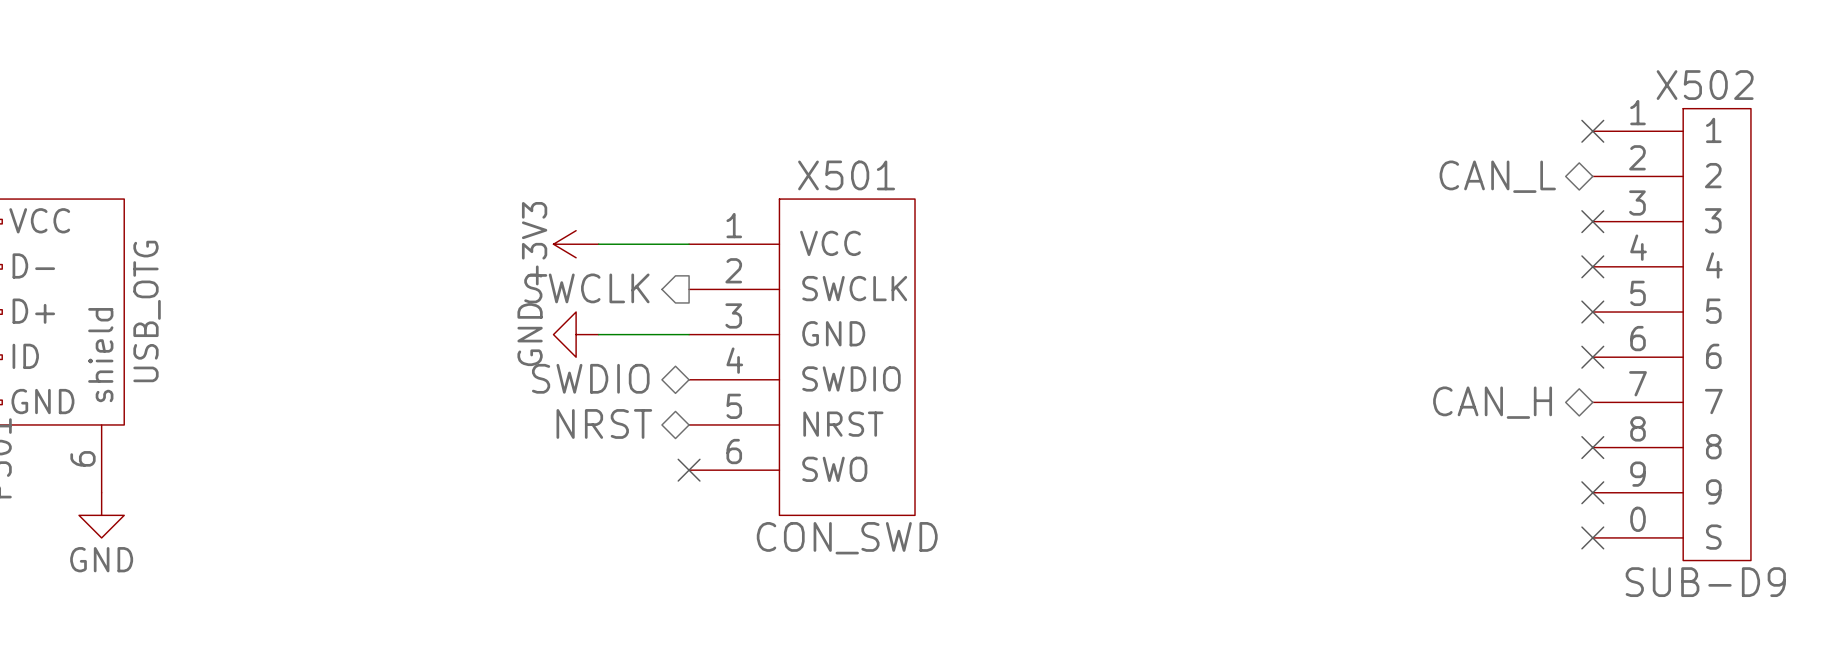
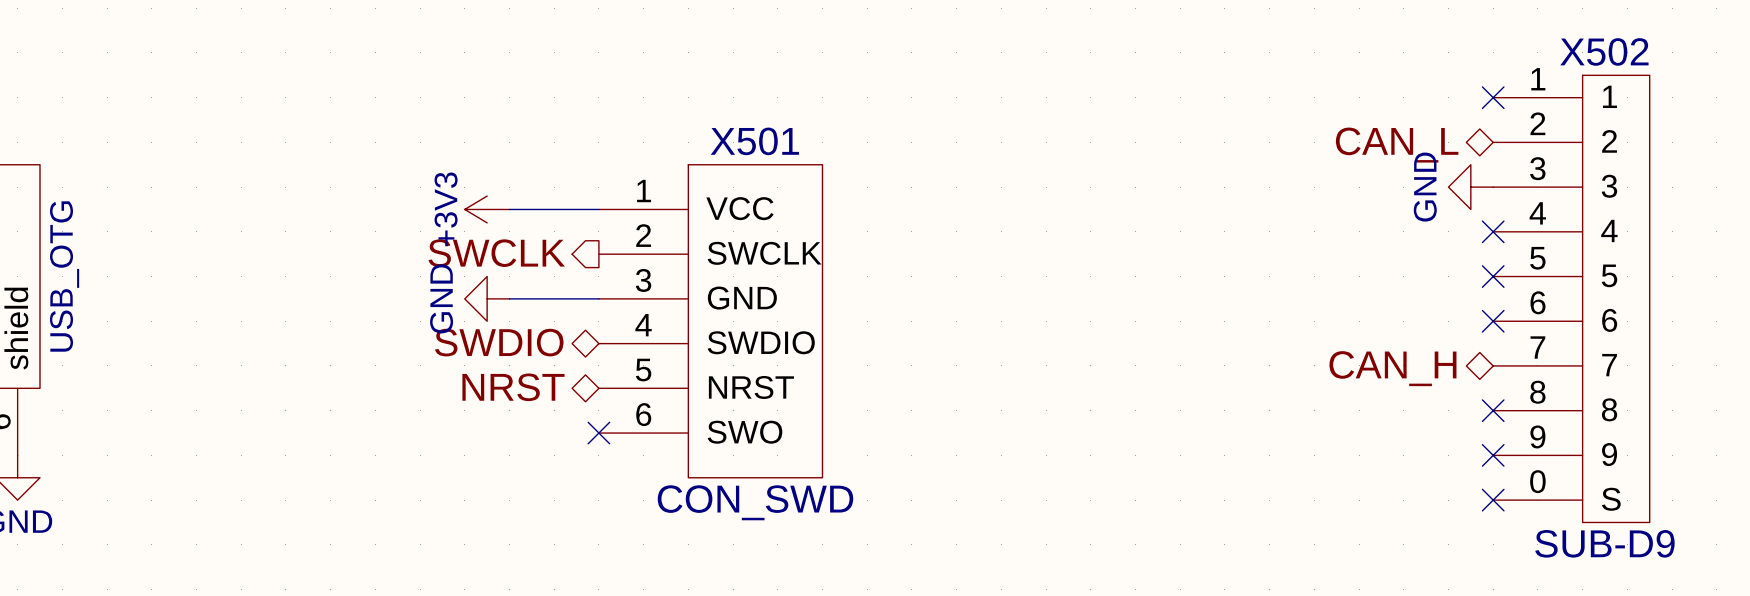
power symbol: none -> GND (1470, 187)
no-connect mark: (1592, 221) -> none

